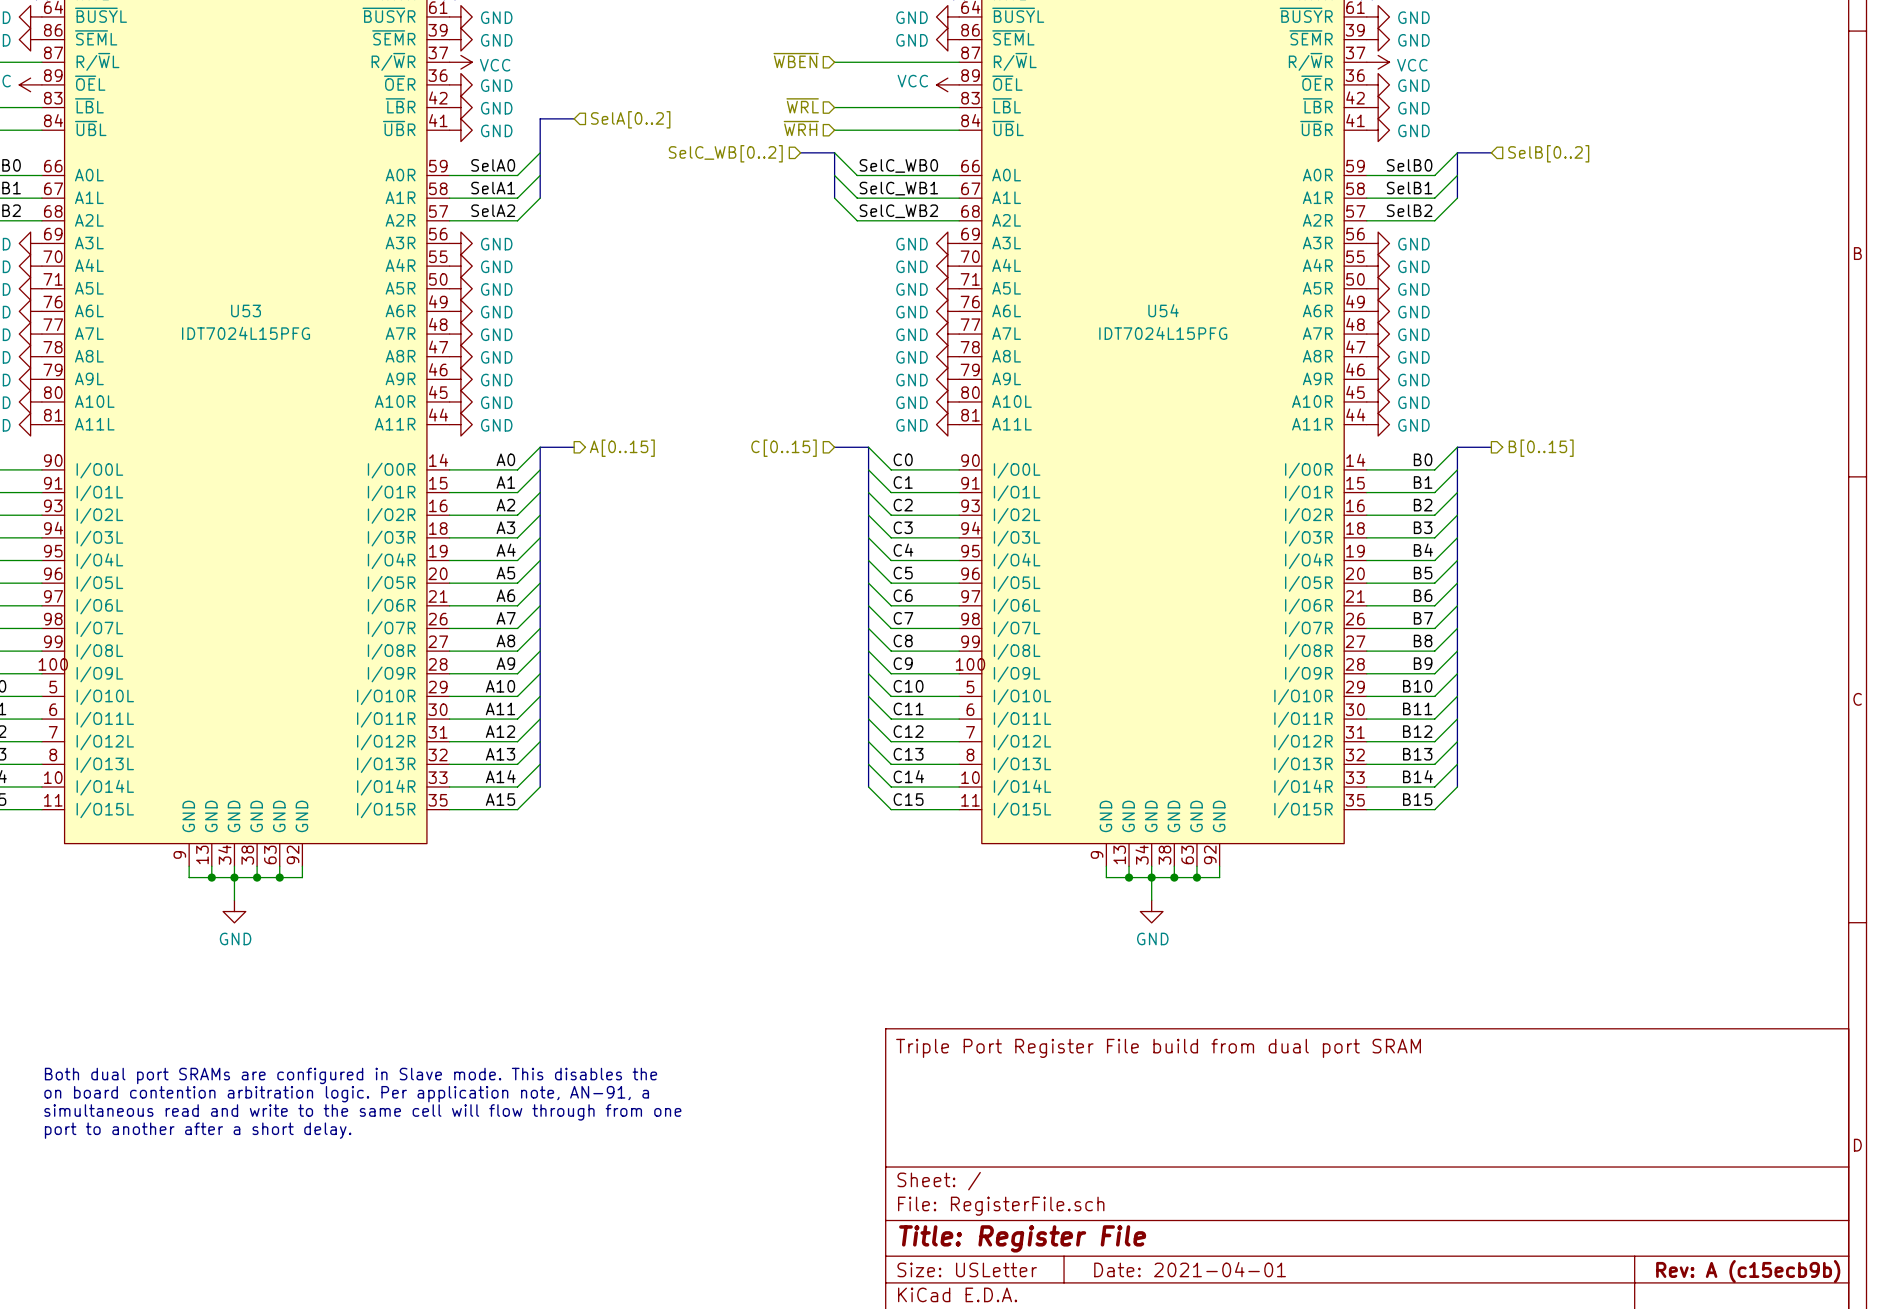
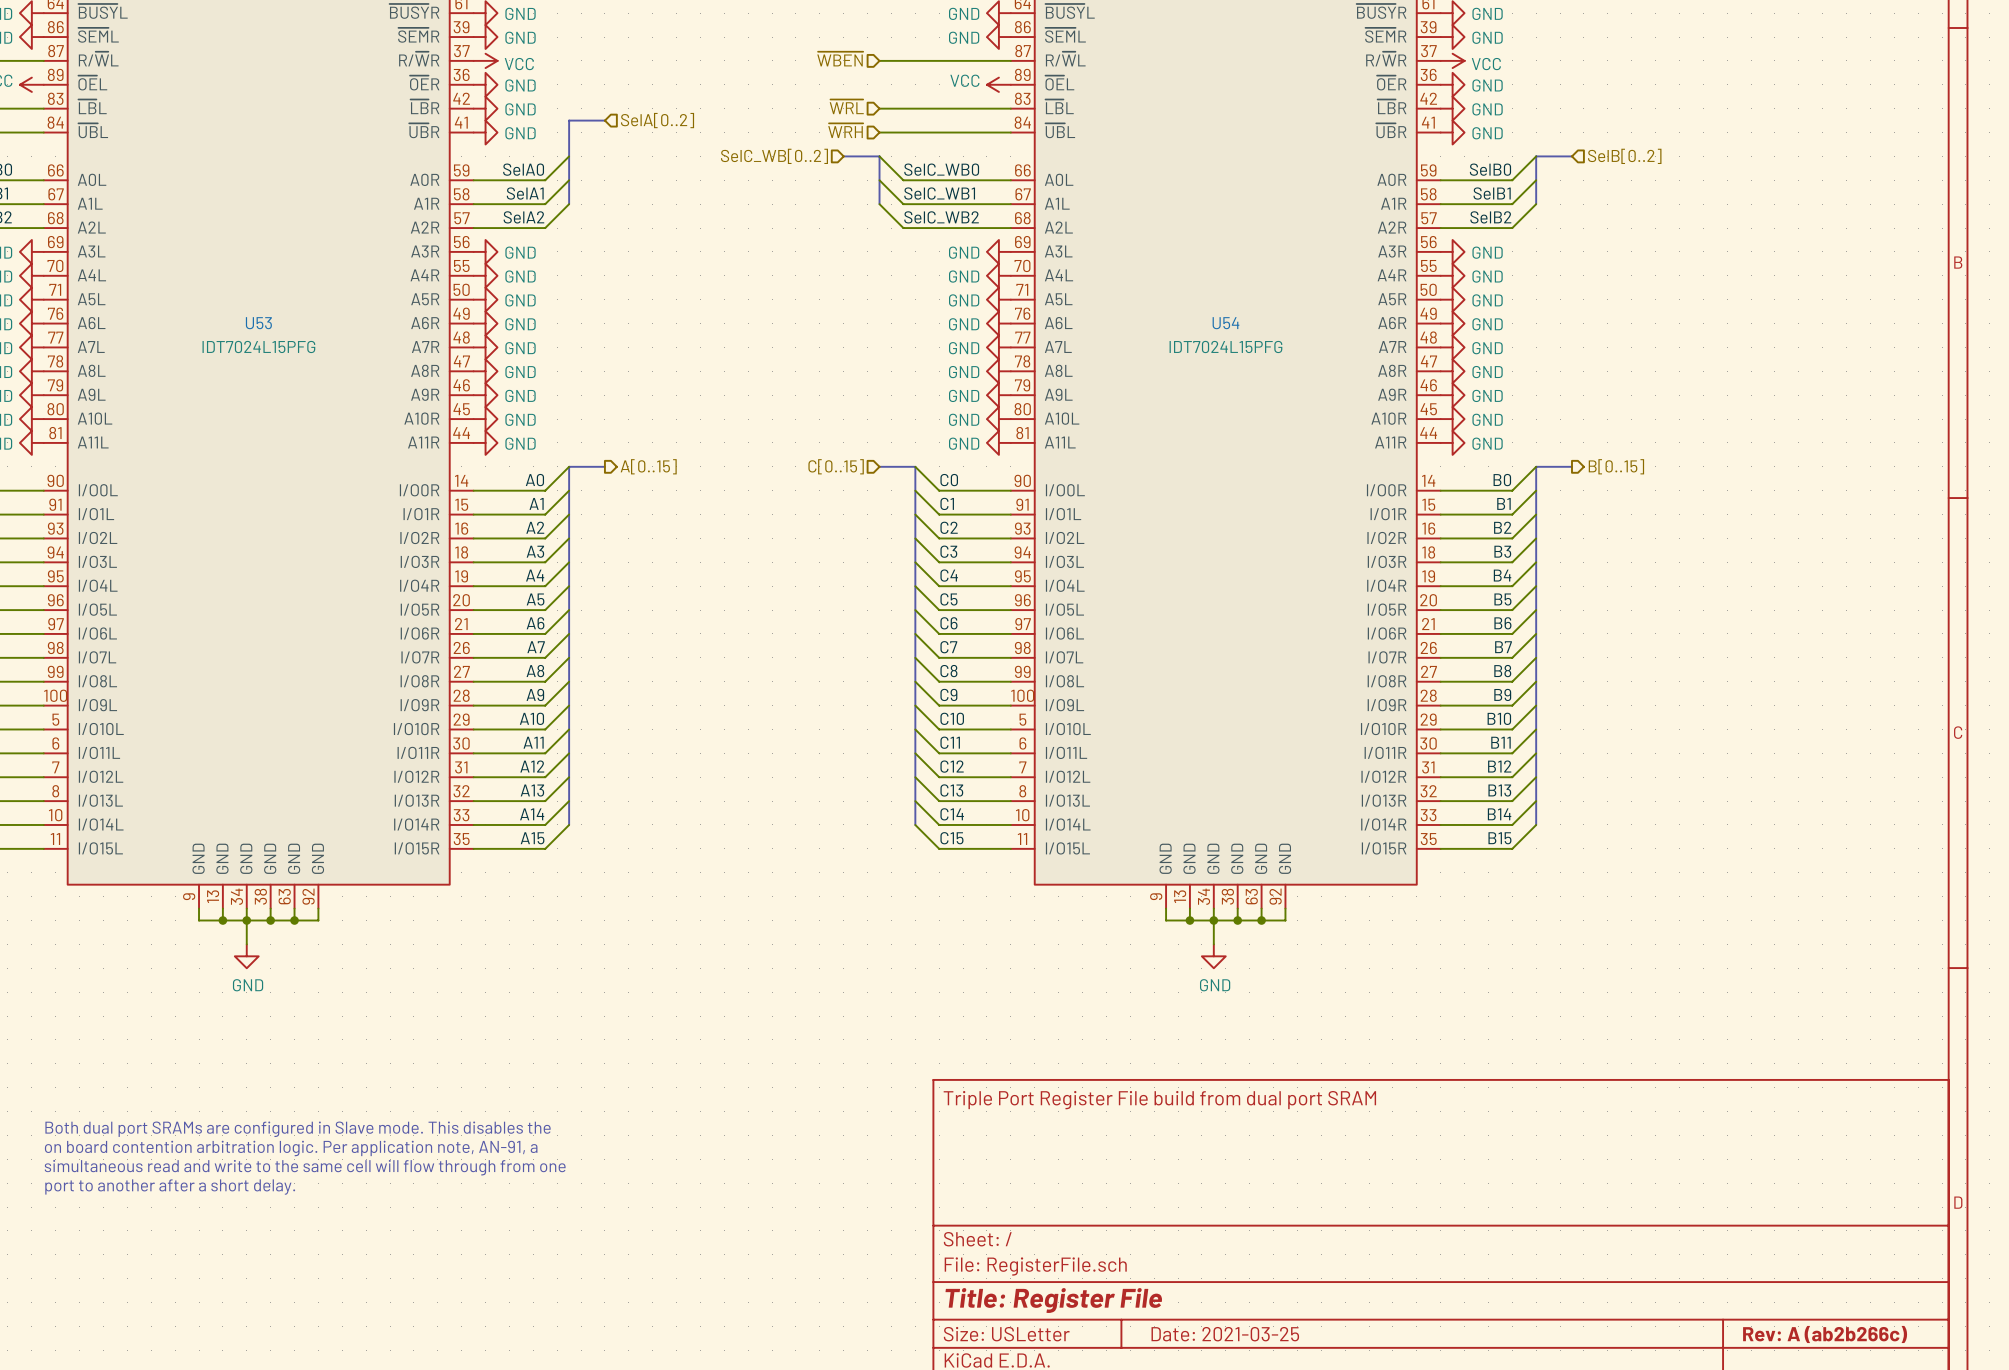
title block: Date: 2021-04-01 (1190, 1269) -> Date: 2021-03-25 (1225, 1334)
title block: Rev: A (c15ecb9b) (1748, 1271) -> Rev: A (ab2b266c) (1825, 1334)

